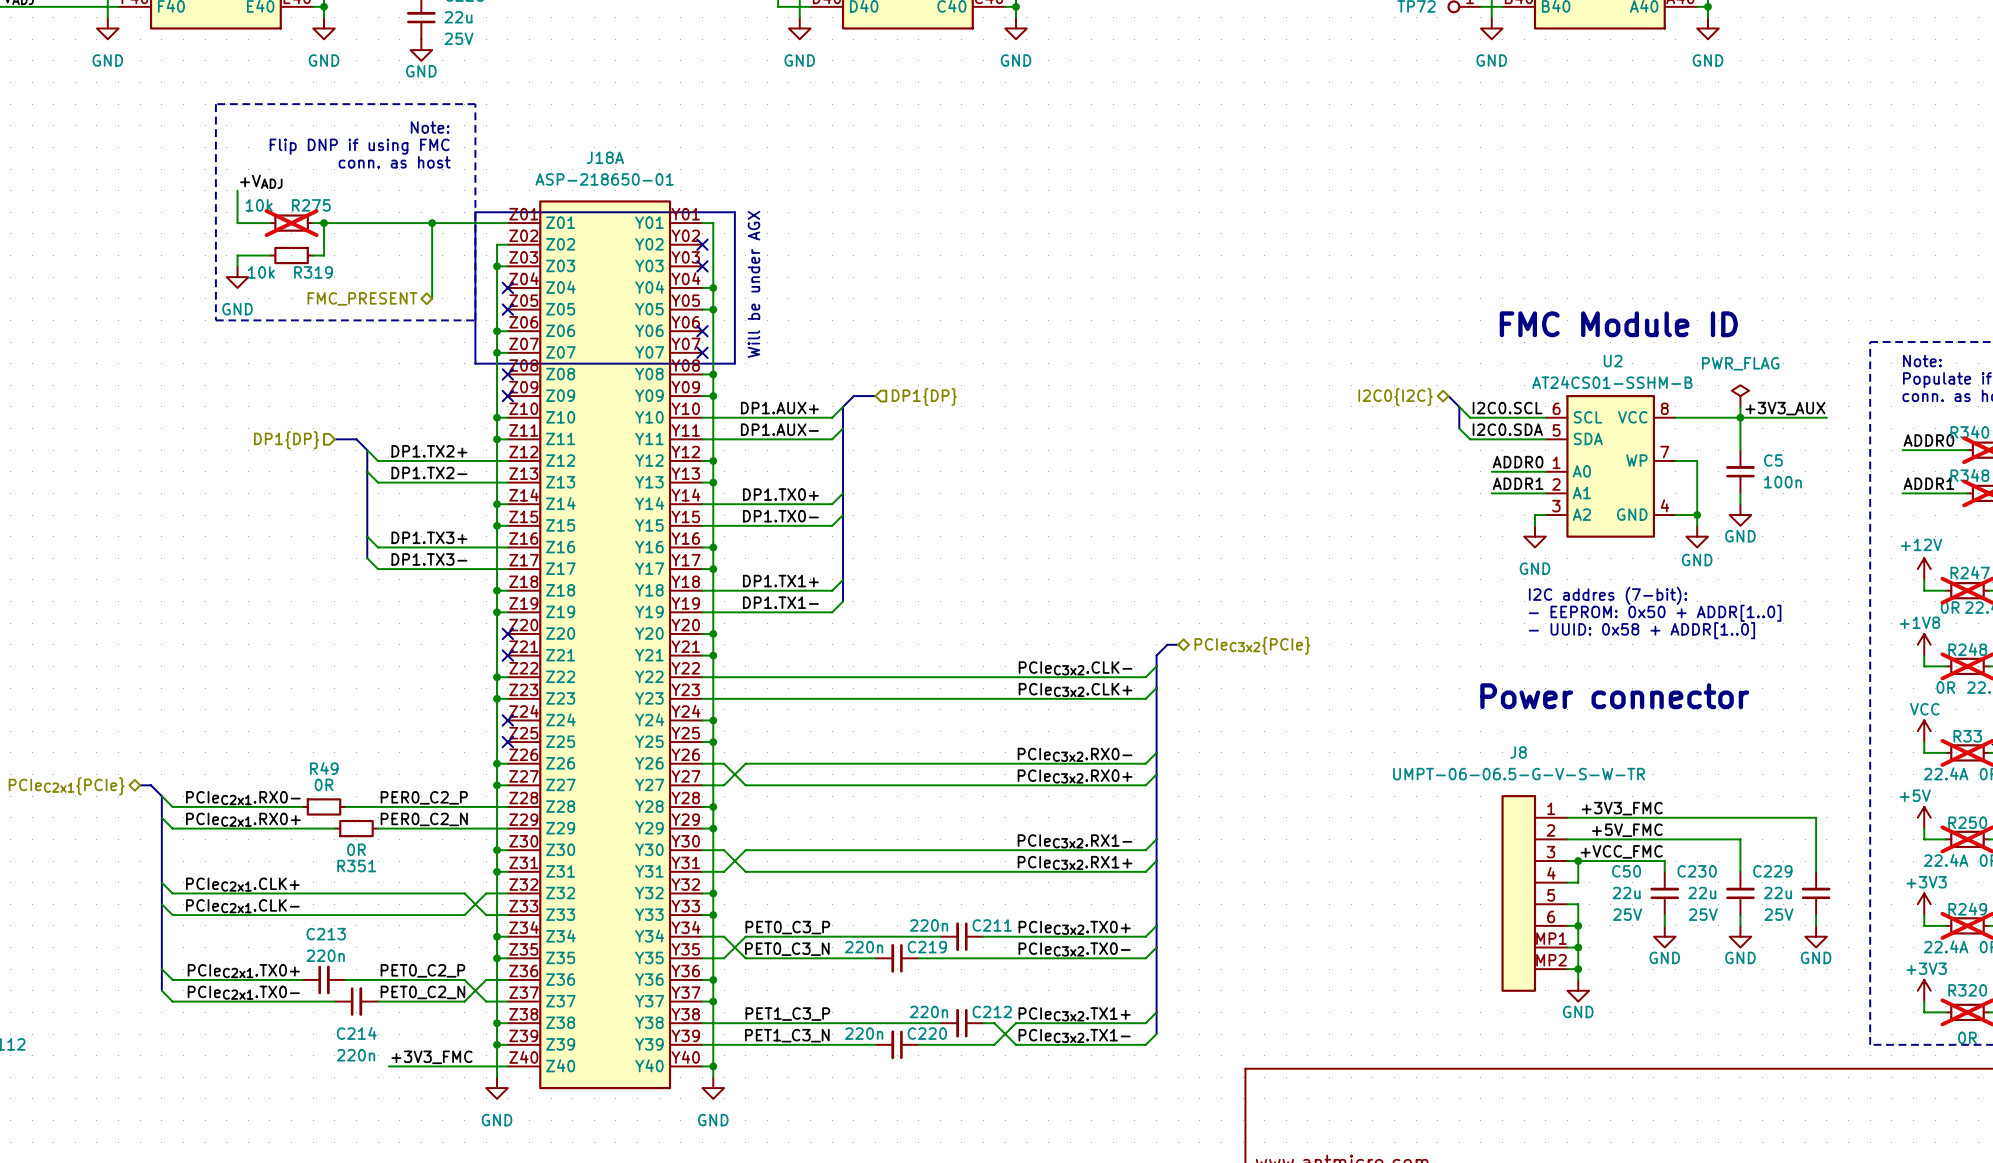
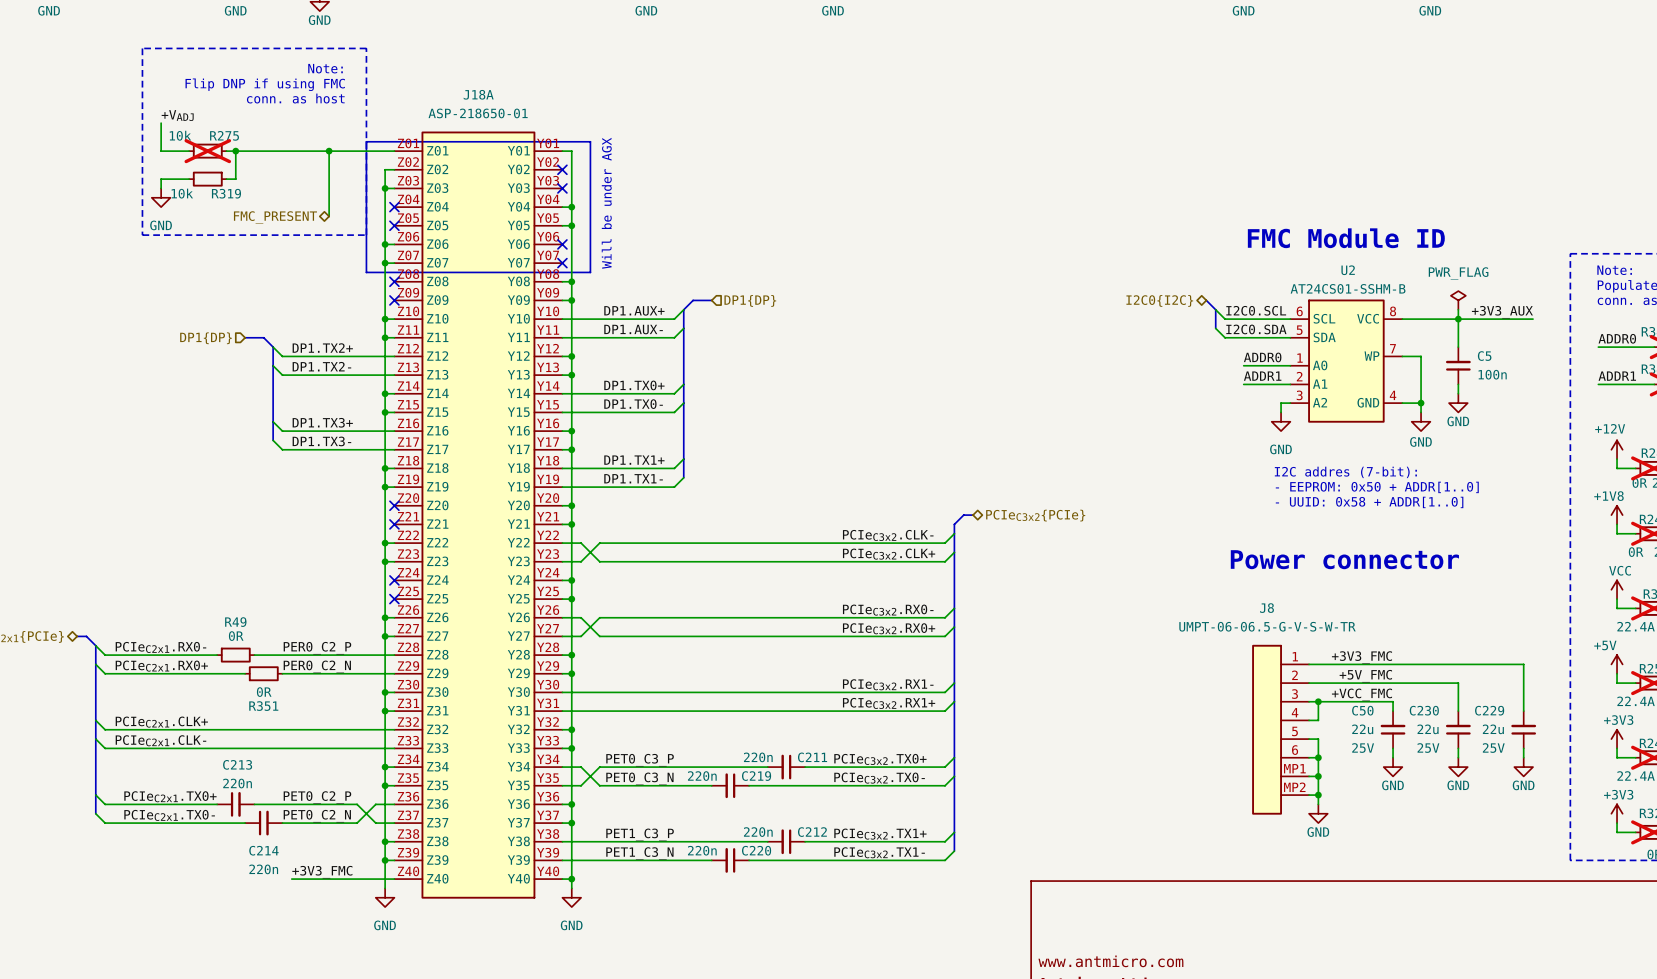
wire: (724, 677) (745, 677) -> (581, 543) (599, 561)
wire: (724, 698) (745, 698) -> (581, 561) (599, 543)
wire: (724, 850) (745, 871) -> (581, 692) (599, 692)
wire: (745, 850) (724, 871) -> (599, 711) (581, 711)
wire: (464, 893) (486, 915) -> (357, 729) (375, 729)
wire: (486, 893) (464, 915) -> (375, 748) (357, 748)
wire: (994, 1023) (1016, 1044) -> (814, 841) (833, 841)
wire: (1016, 1023) (994, 1044) -> (833, 860) (814, 860)

